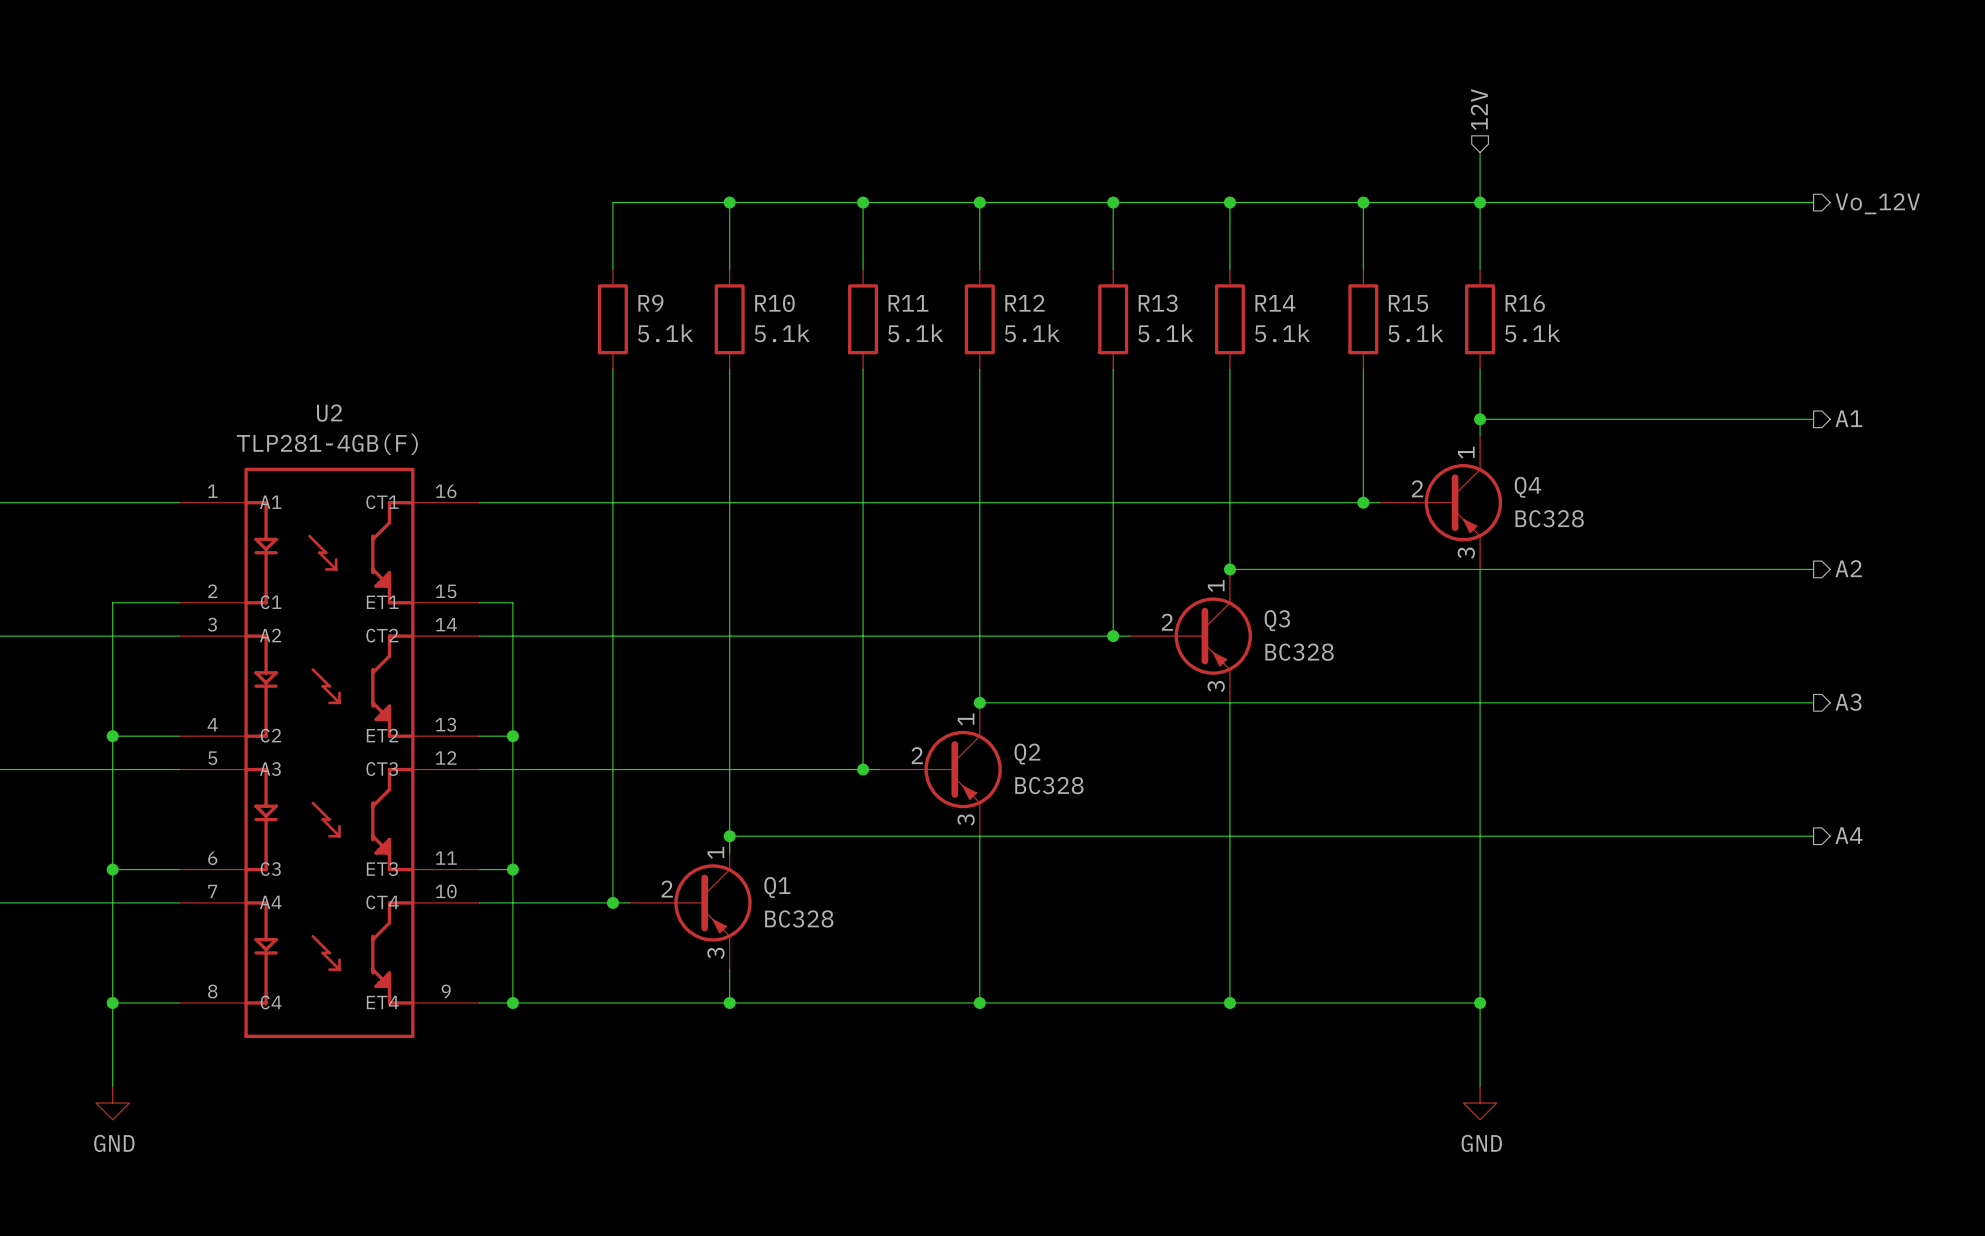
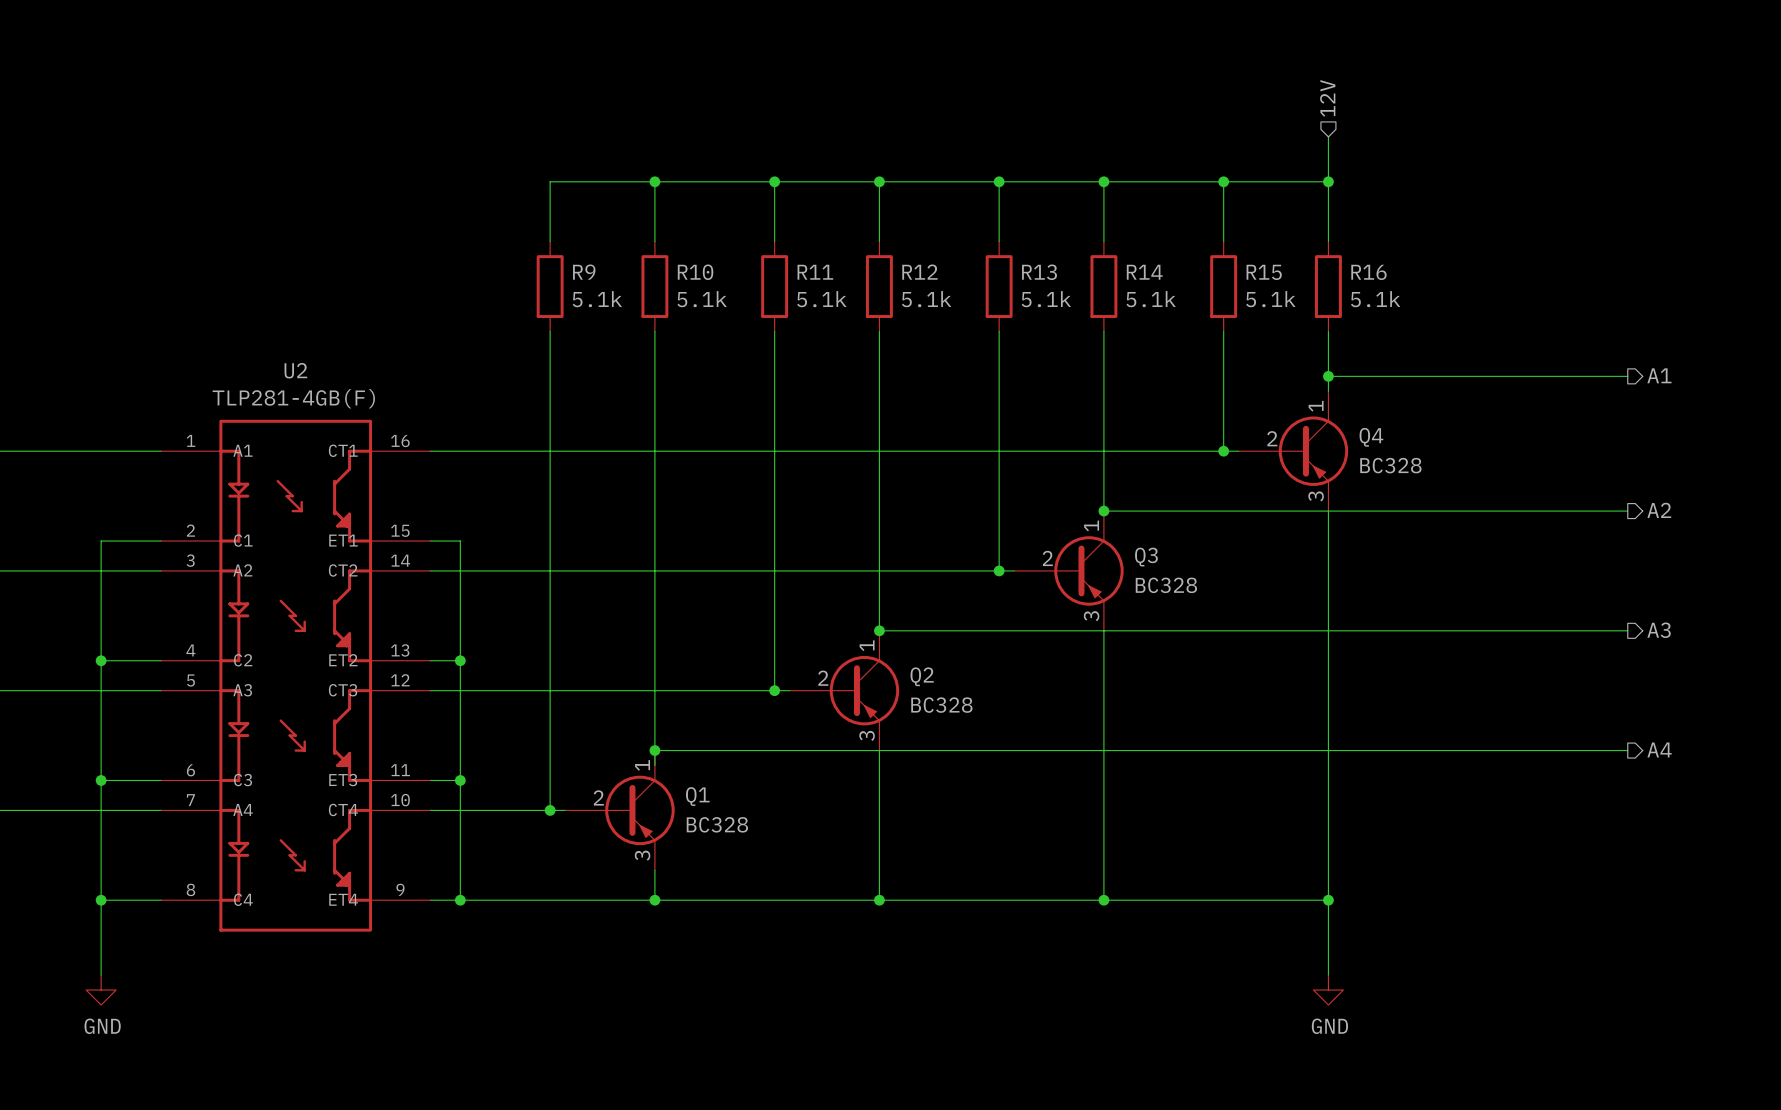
wire: (1480, 202) (1813, 202) -> none
hierarchical label: Vo_12V (1877, 203) -> none

